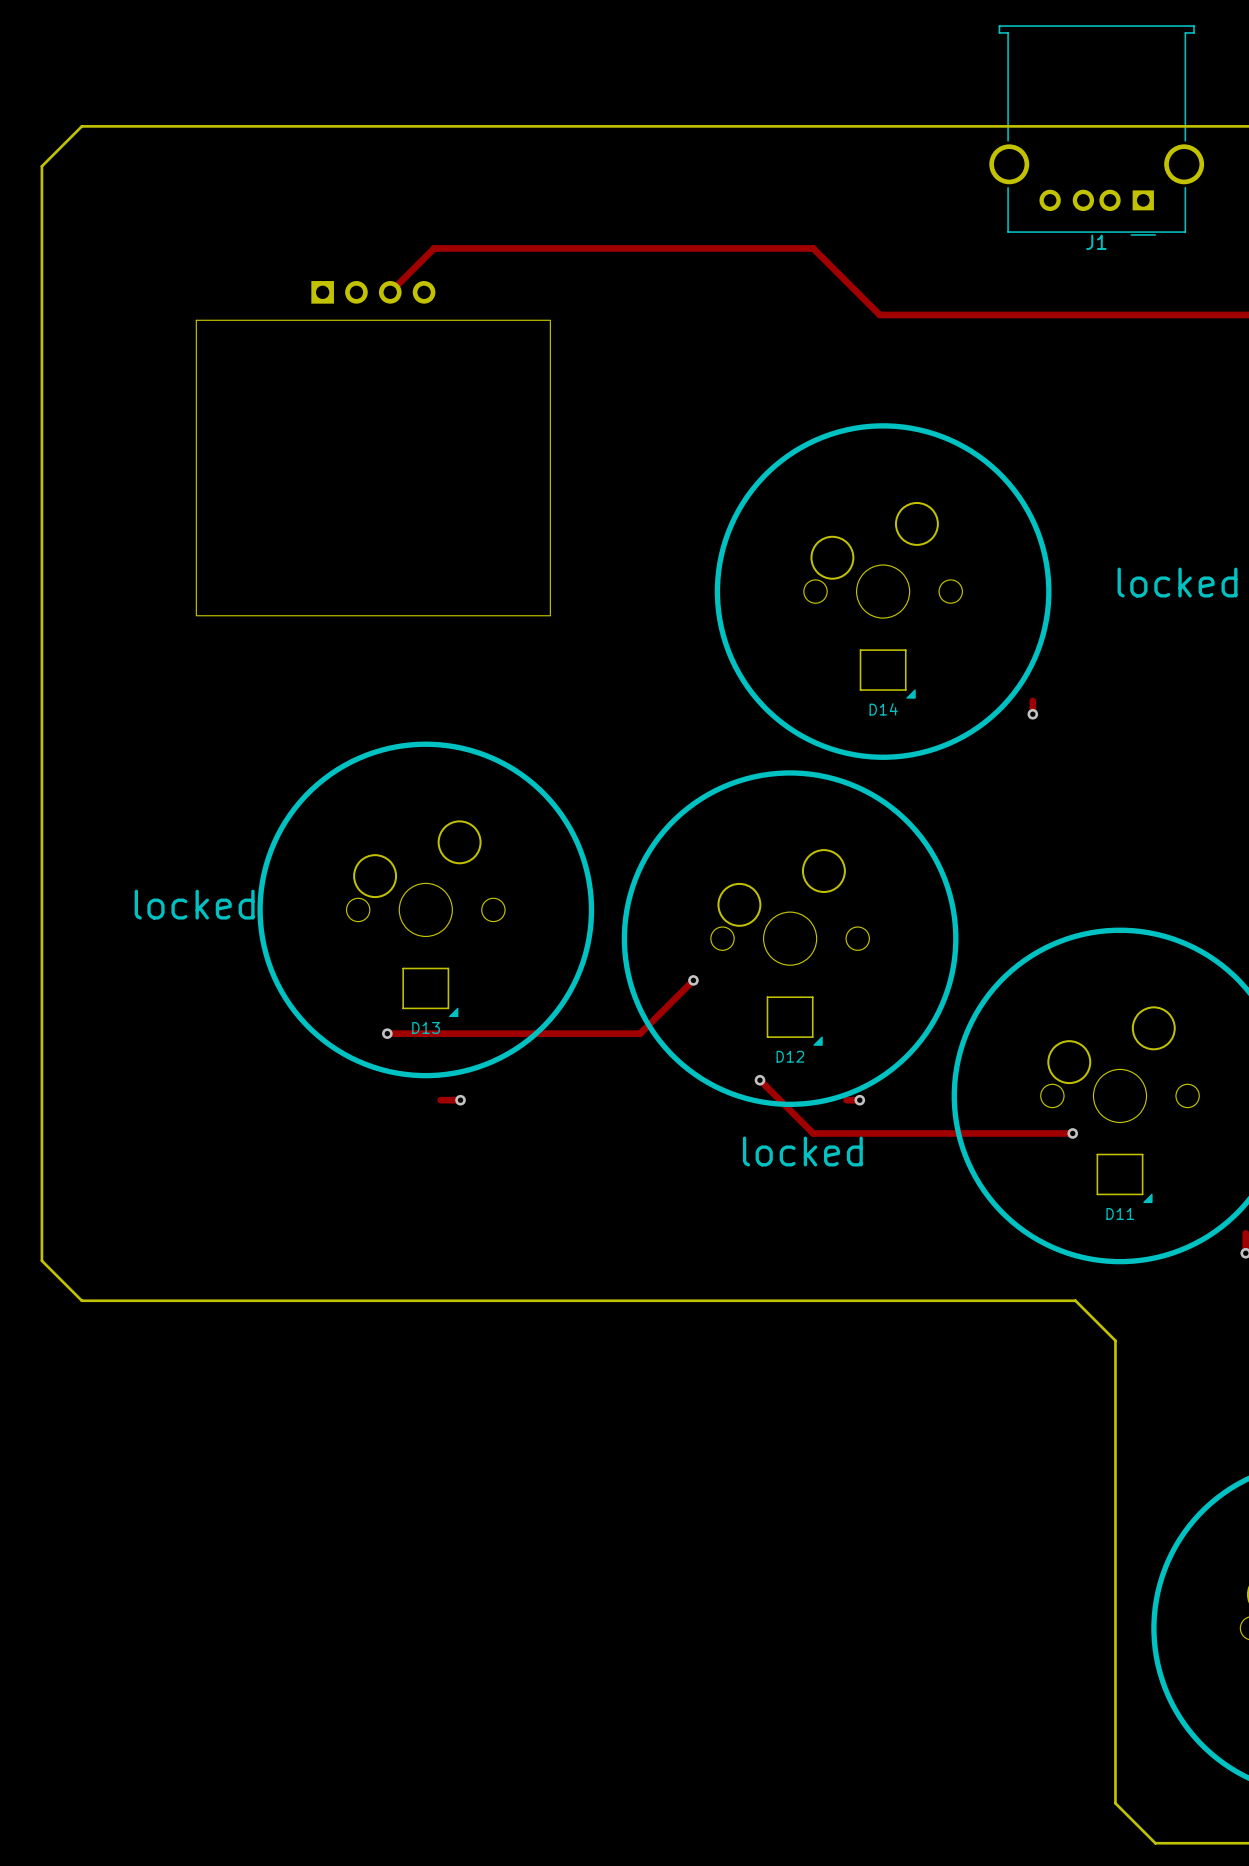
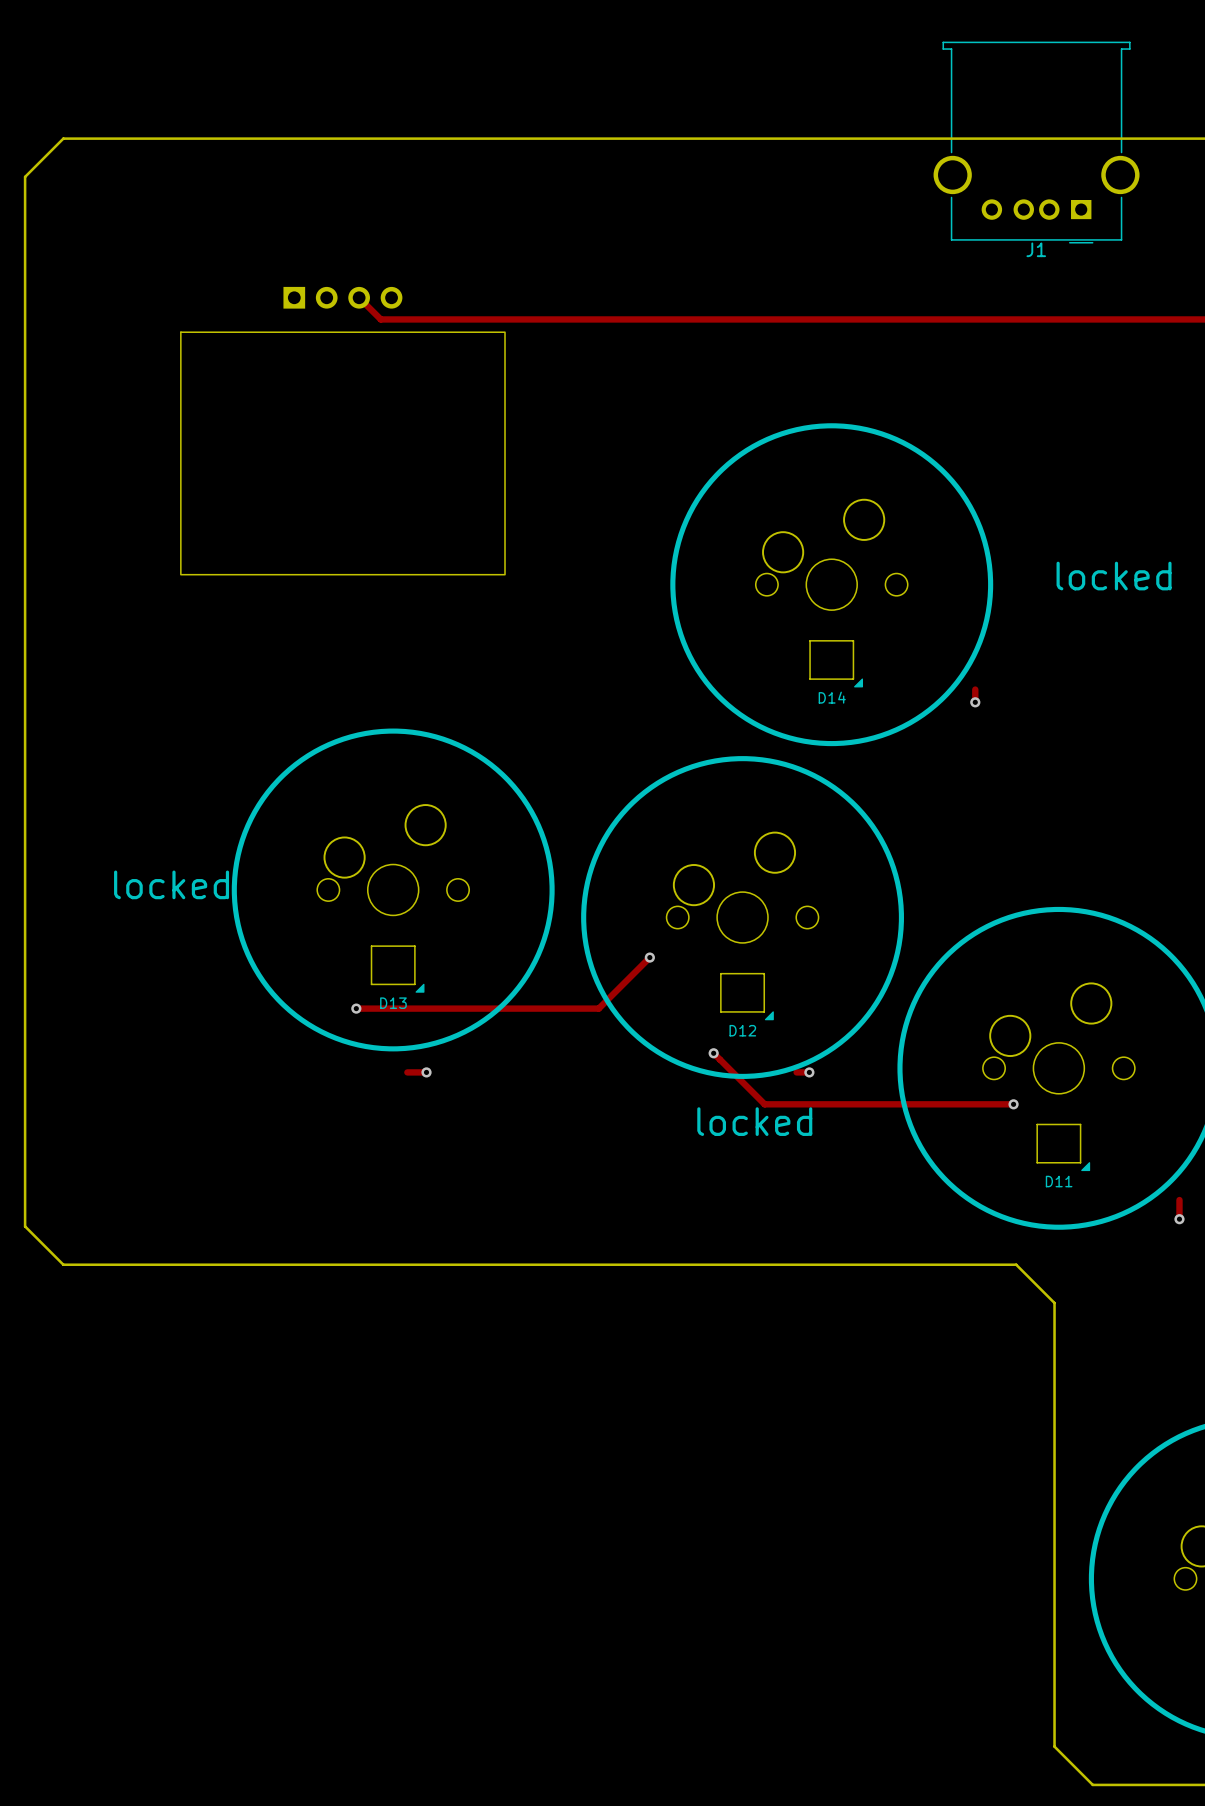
track: (390, 292) (434, 248) (813, 248) (879, 314) -> (359, 297) (380, 319) (828, 319)
part: none -> (342, 430)
part: (373, 448) -> none

